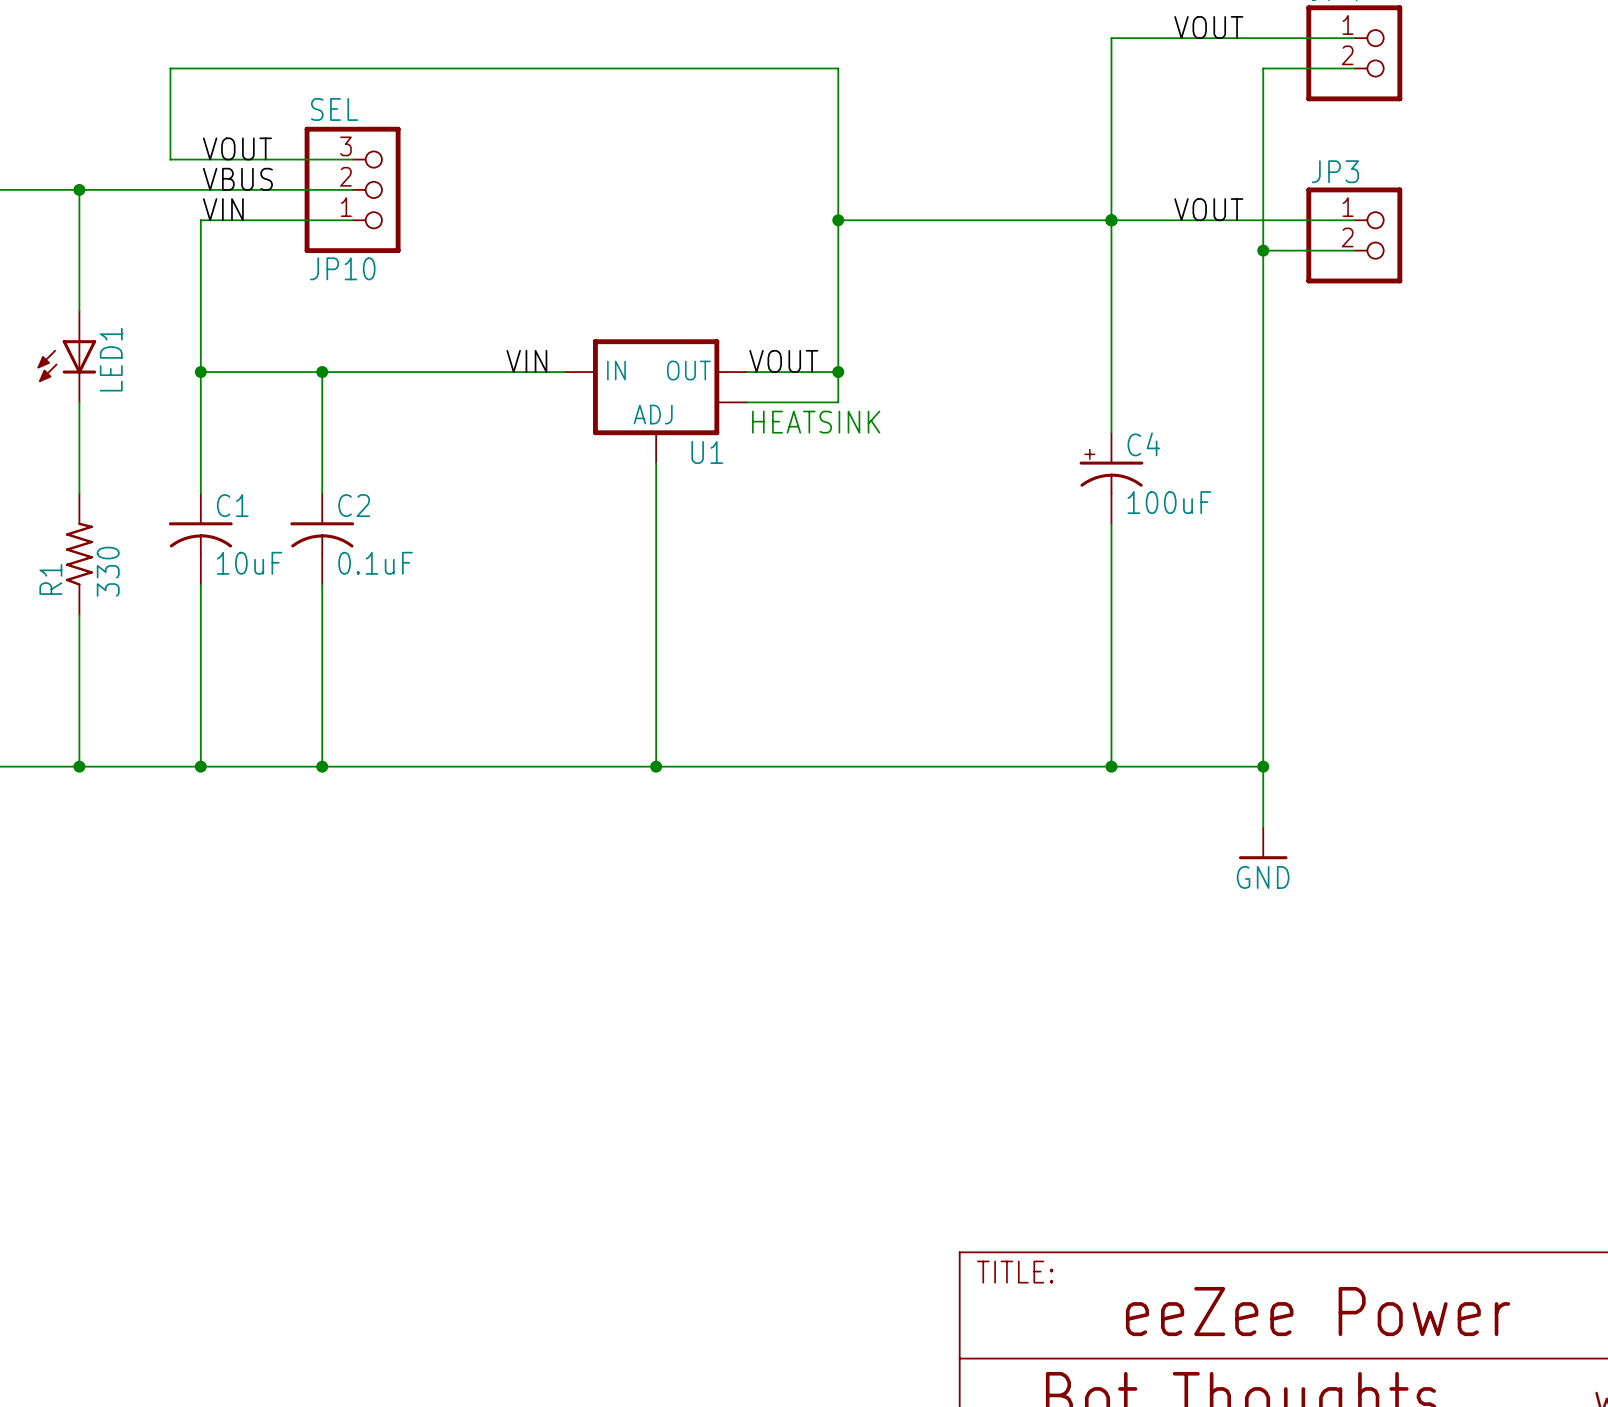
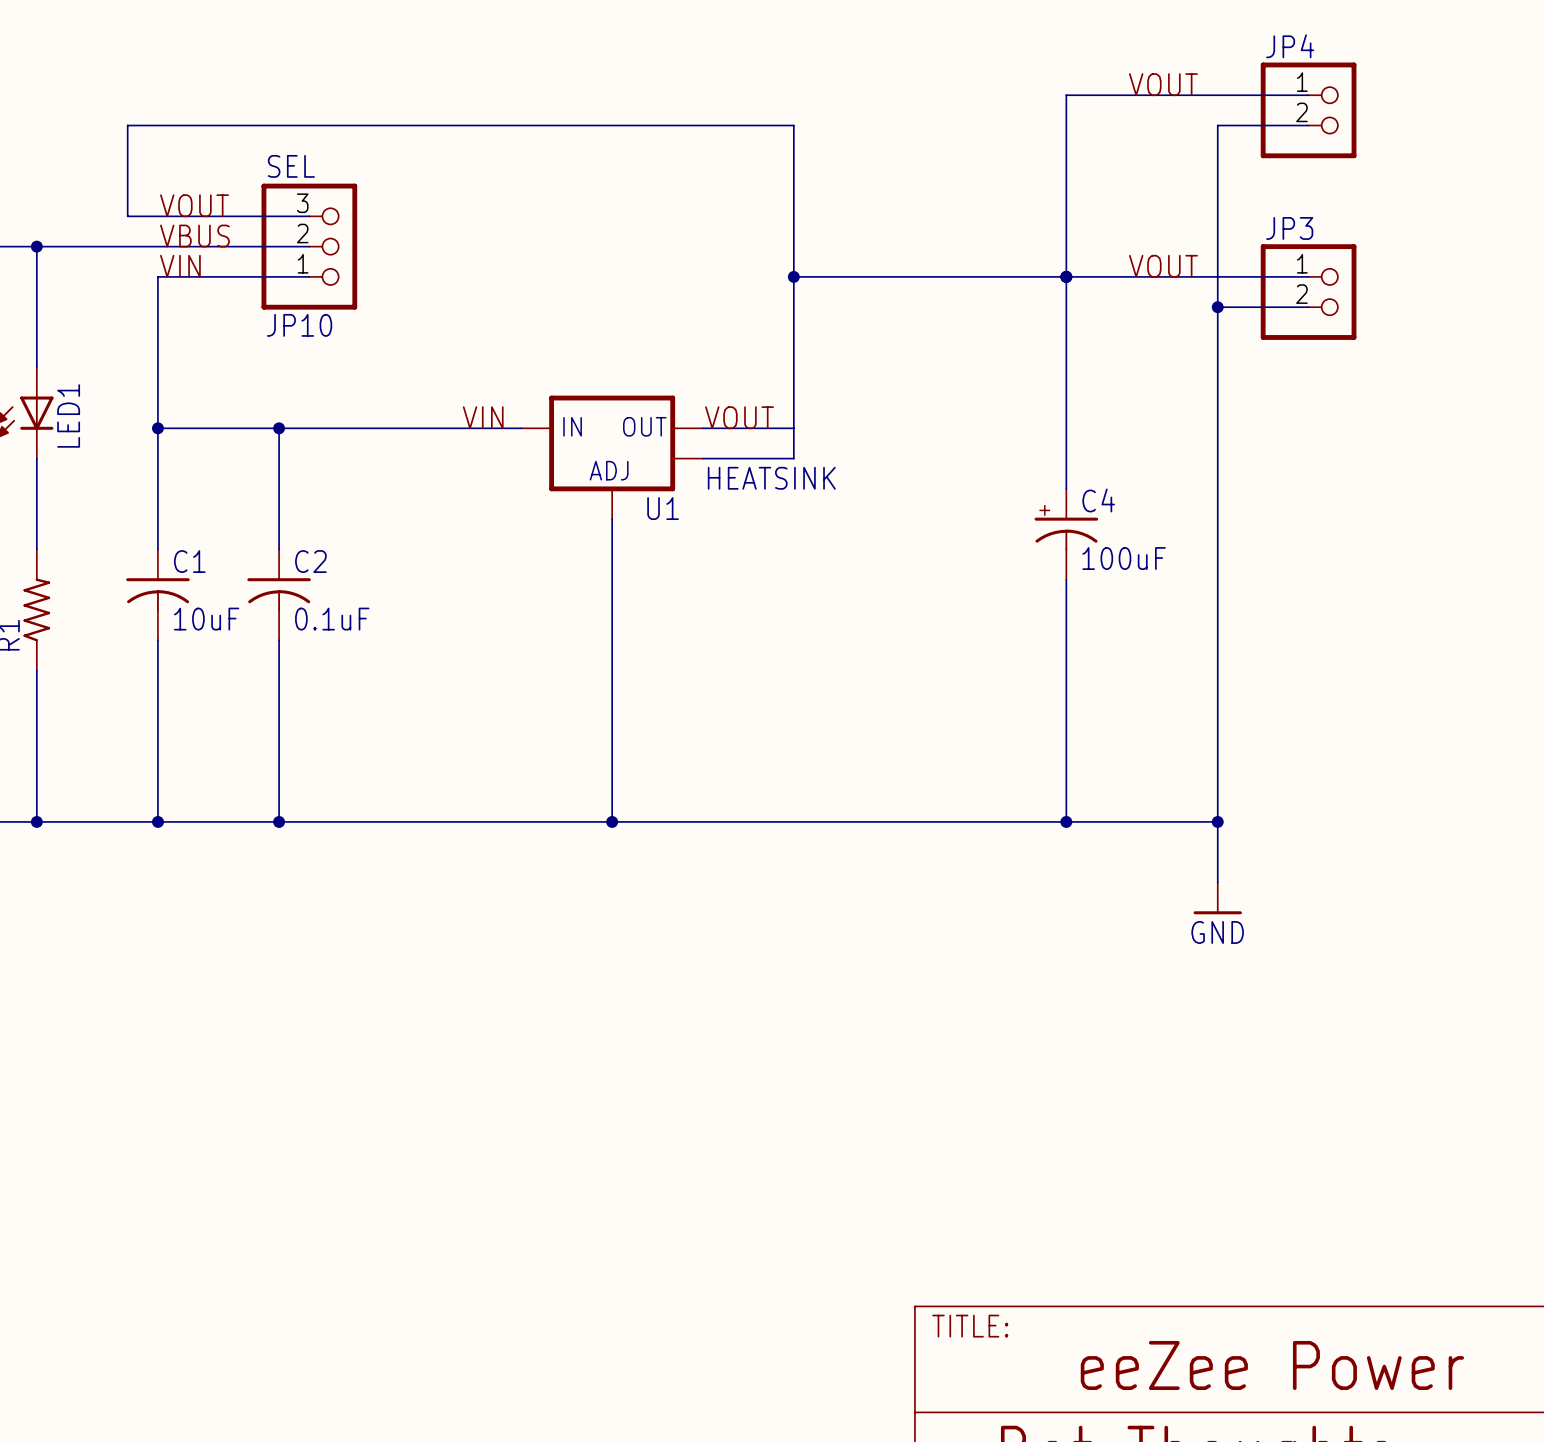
junction: (838, 372) -> none
R1 value: 330 (108, 571) -> none

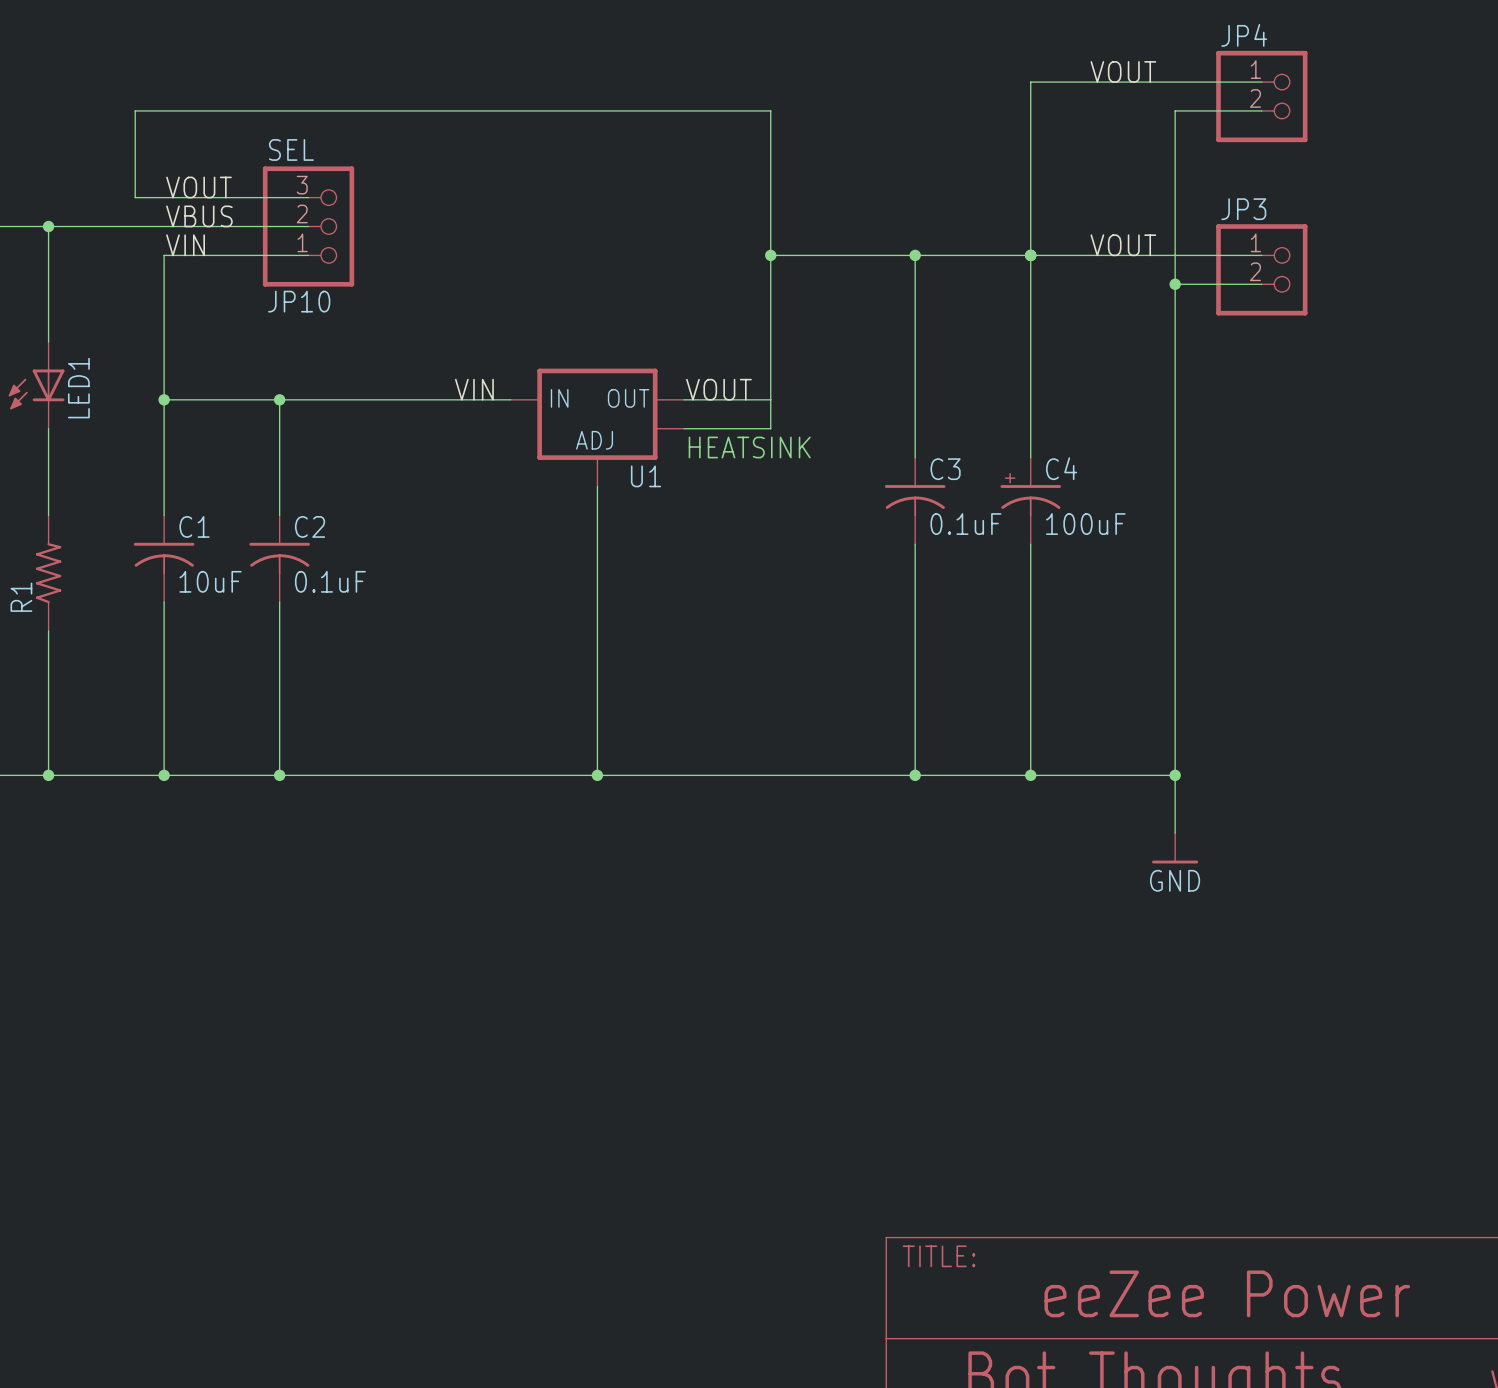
wire: none -> (915, 255) (915, 457)
junction: none -> (915, 255)
C3: none -> 0.1uF (915, 500)
wire: none -> (915, 544) (915, 775)
junction: none -> (915, 775)

